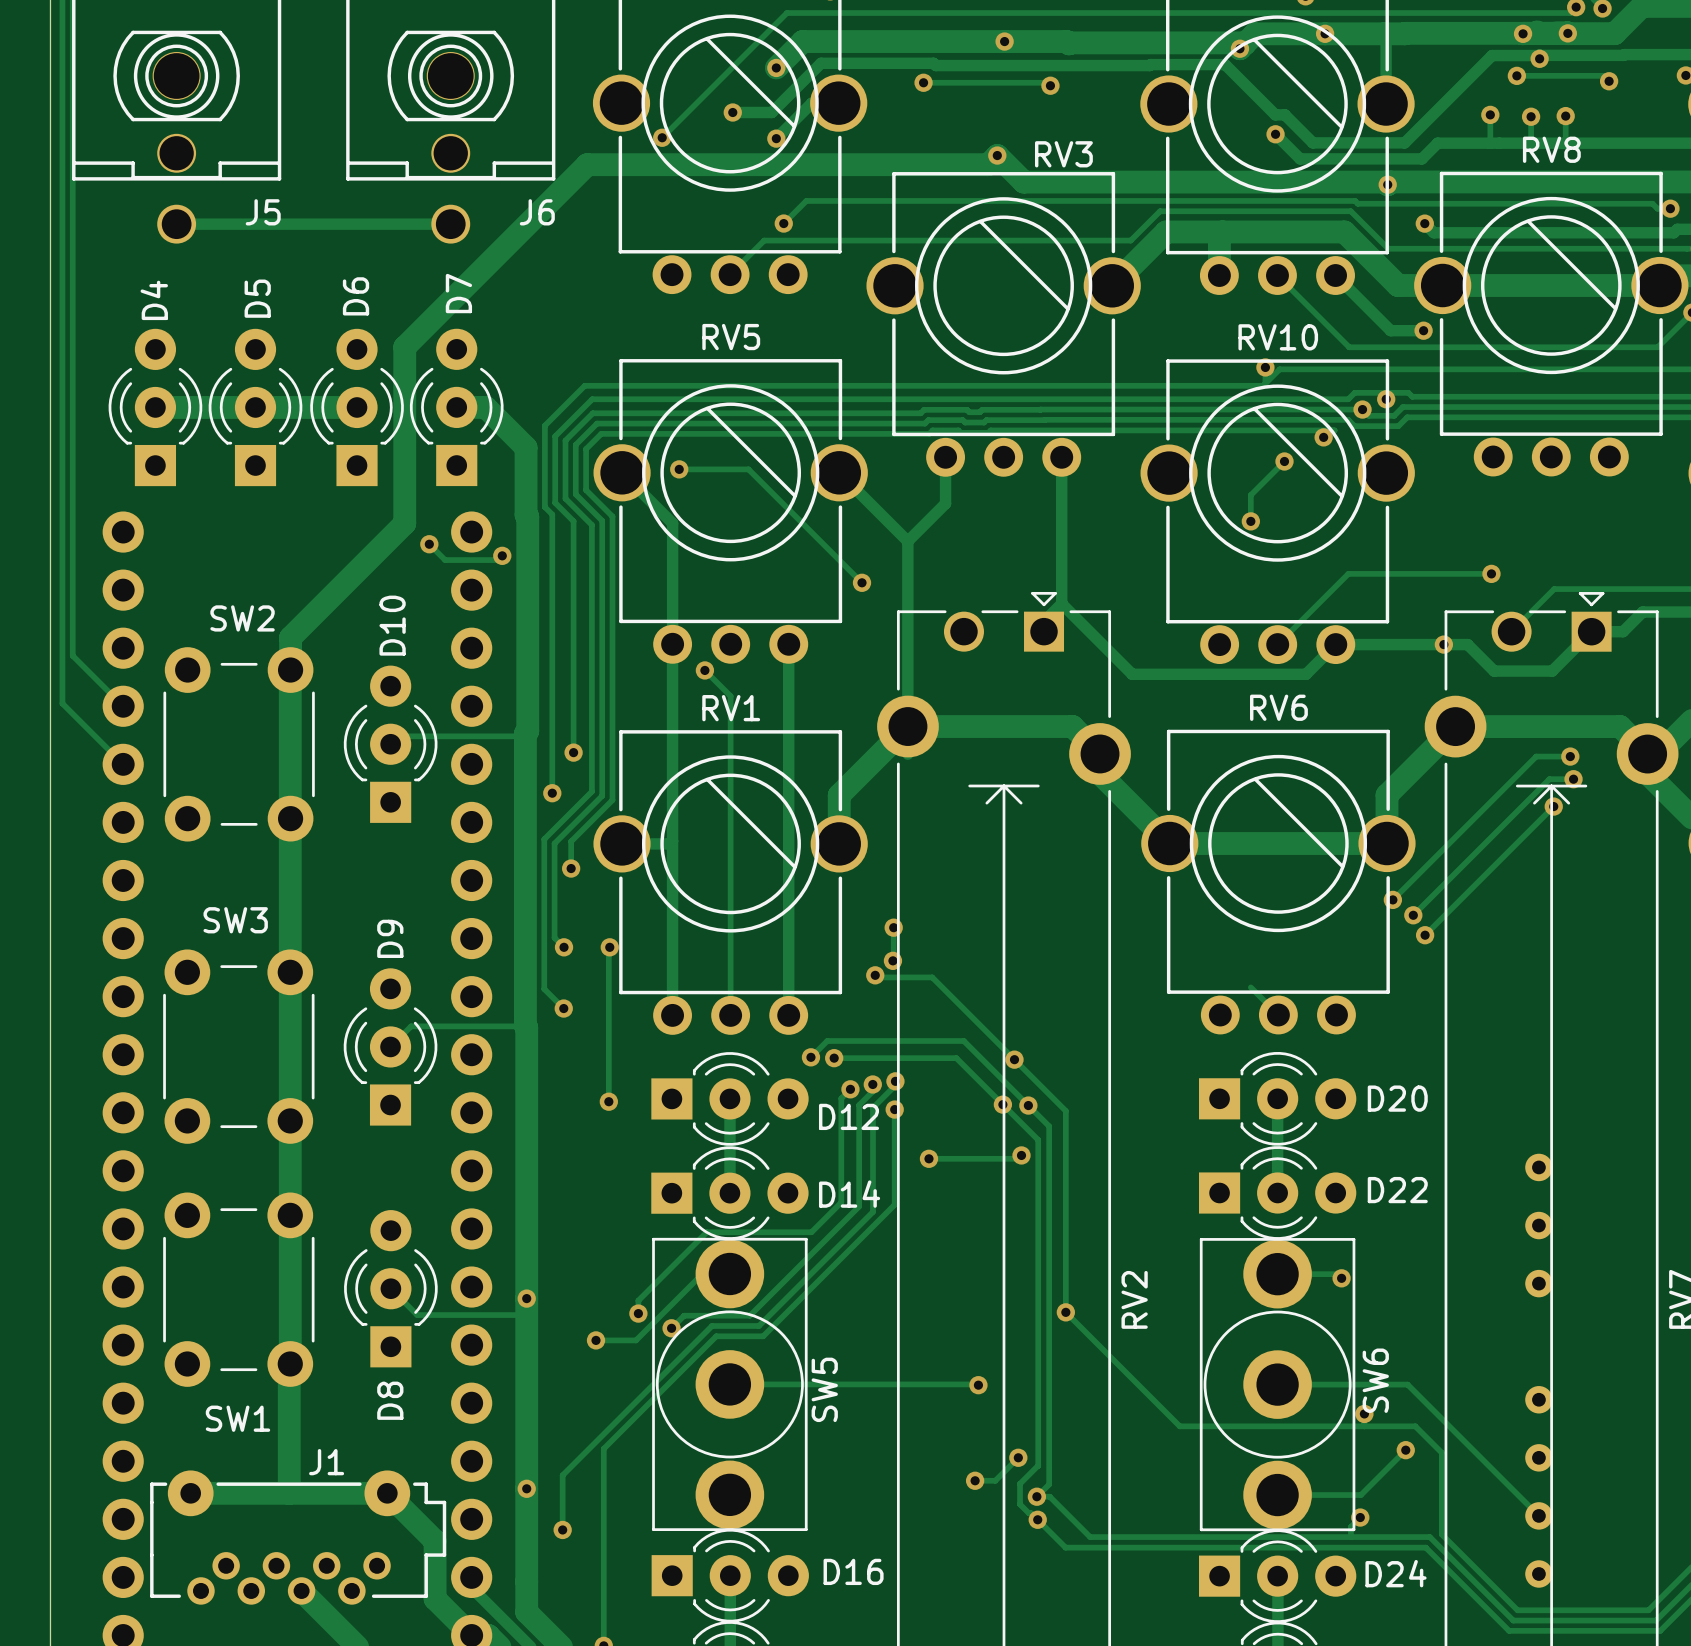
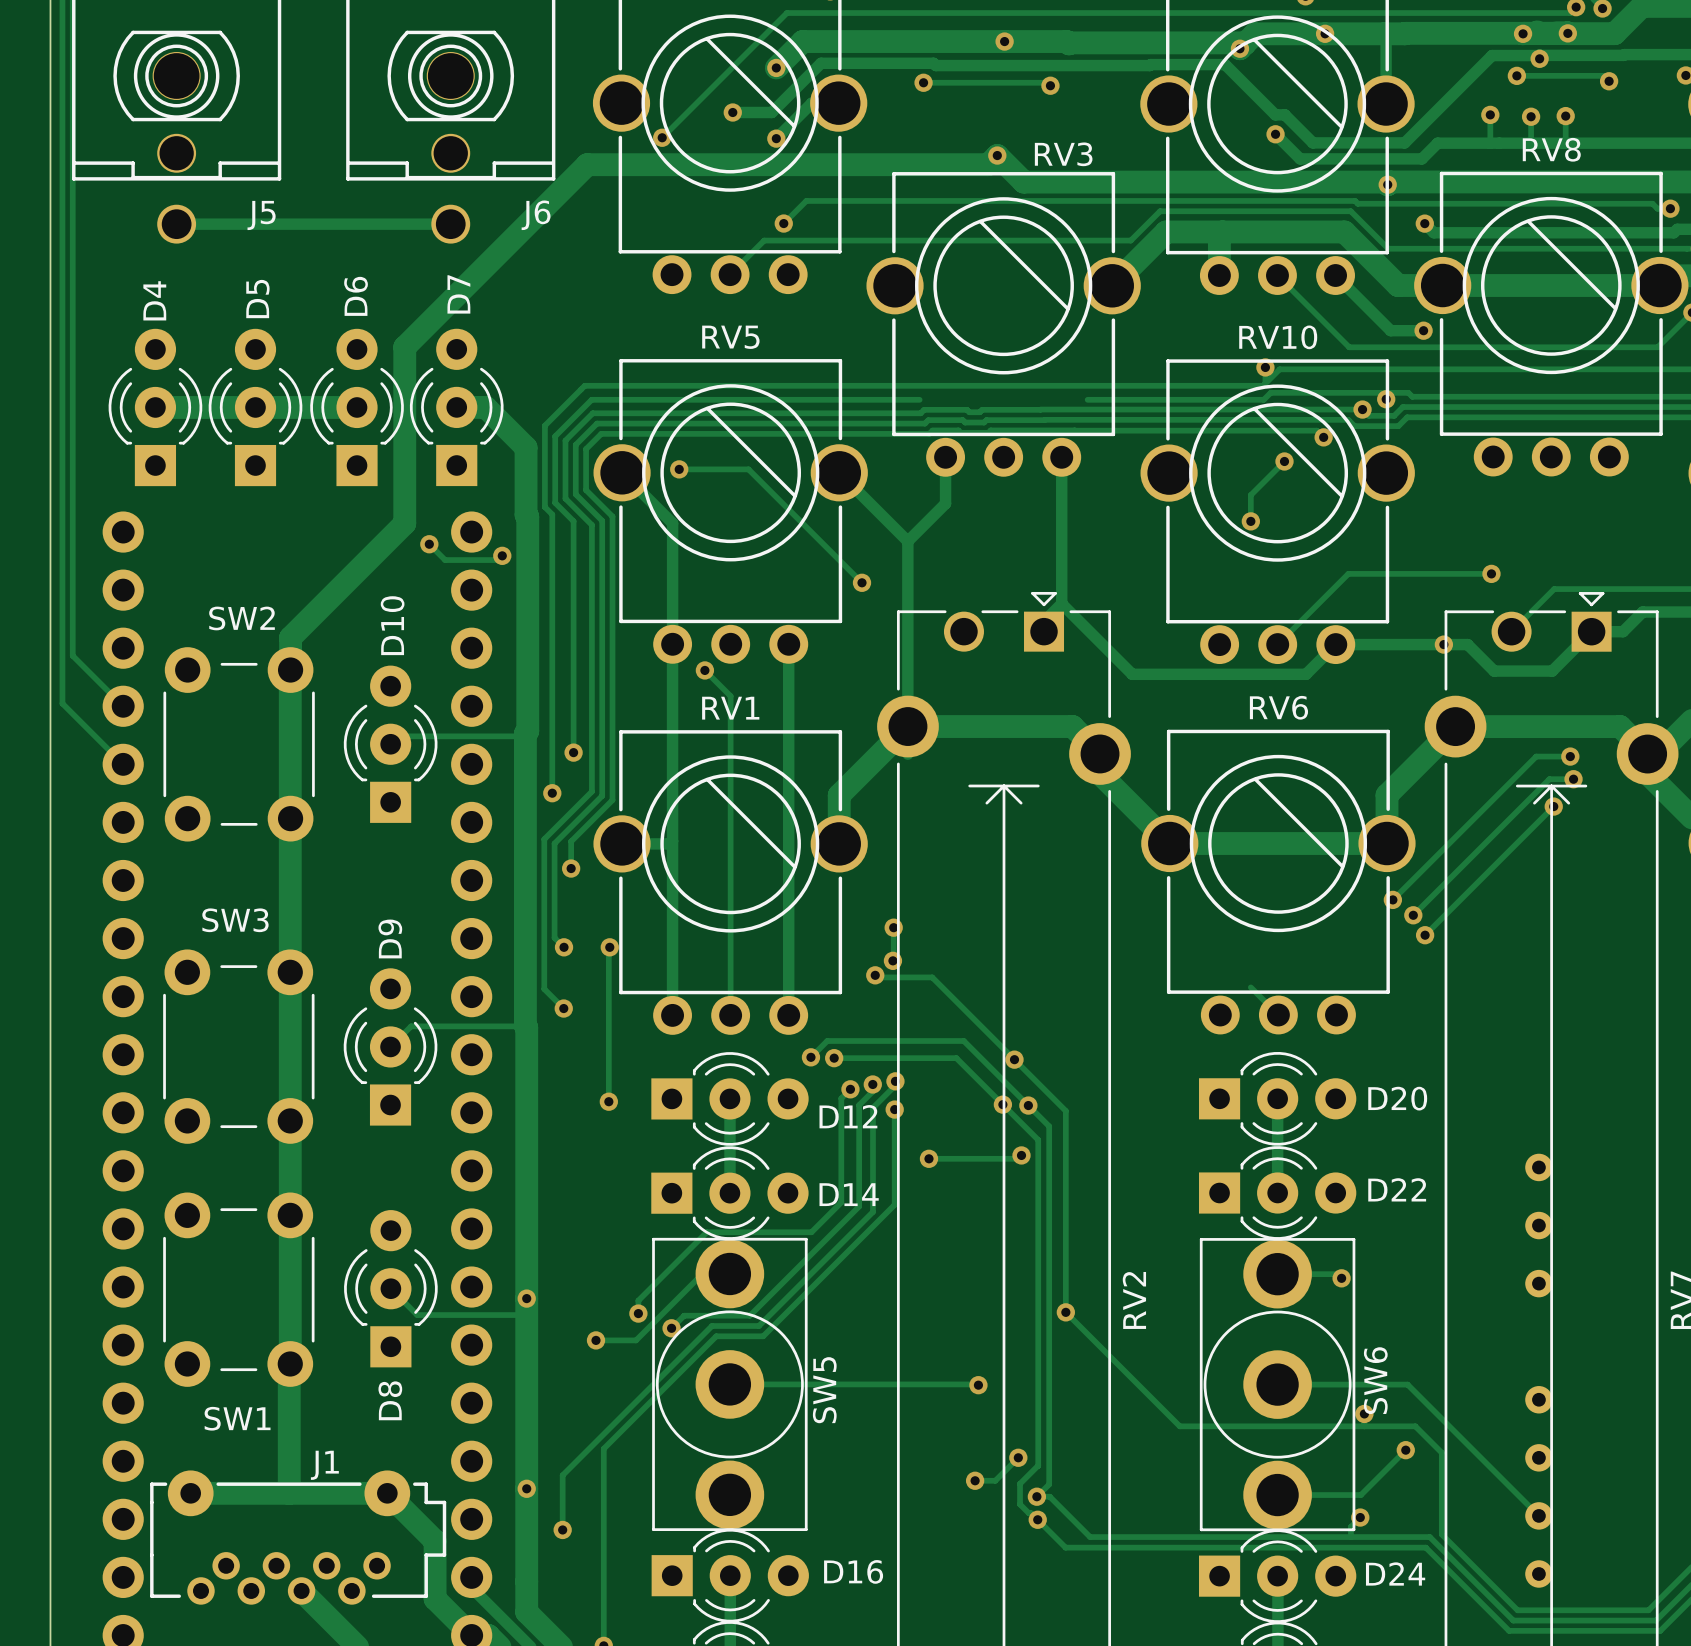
track: (1354, 392) (1348, 399) (591, 399) -> (919, 399) (591, 399)
track: none -> (1354, 392) (1270, 392) (1263, 399) (1087, 399)
track: (1074, 430) (1334, 430) -> (1074, 430) (1316, 430) (1323, 437)

